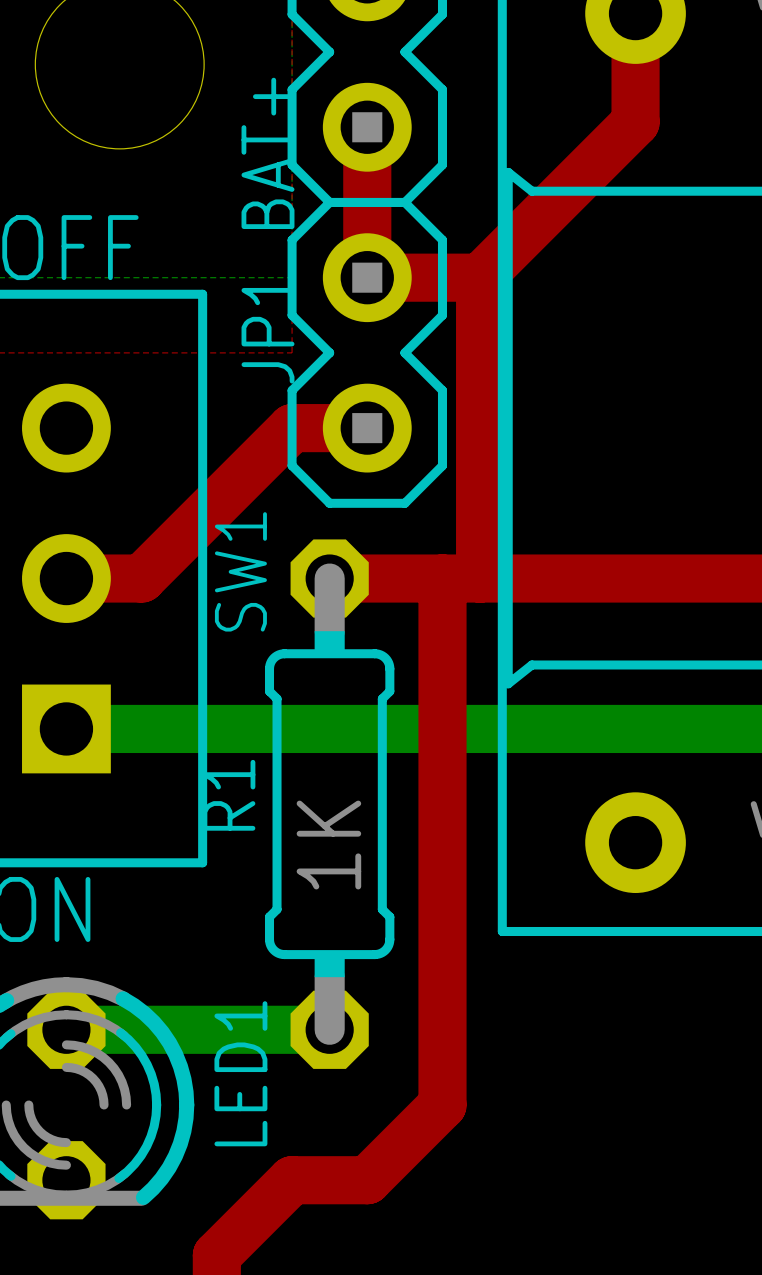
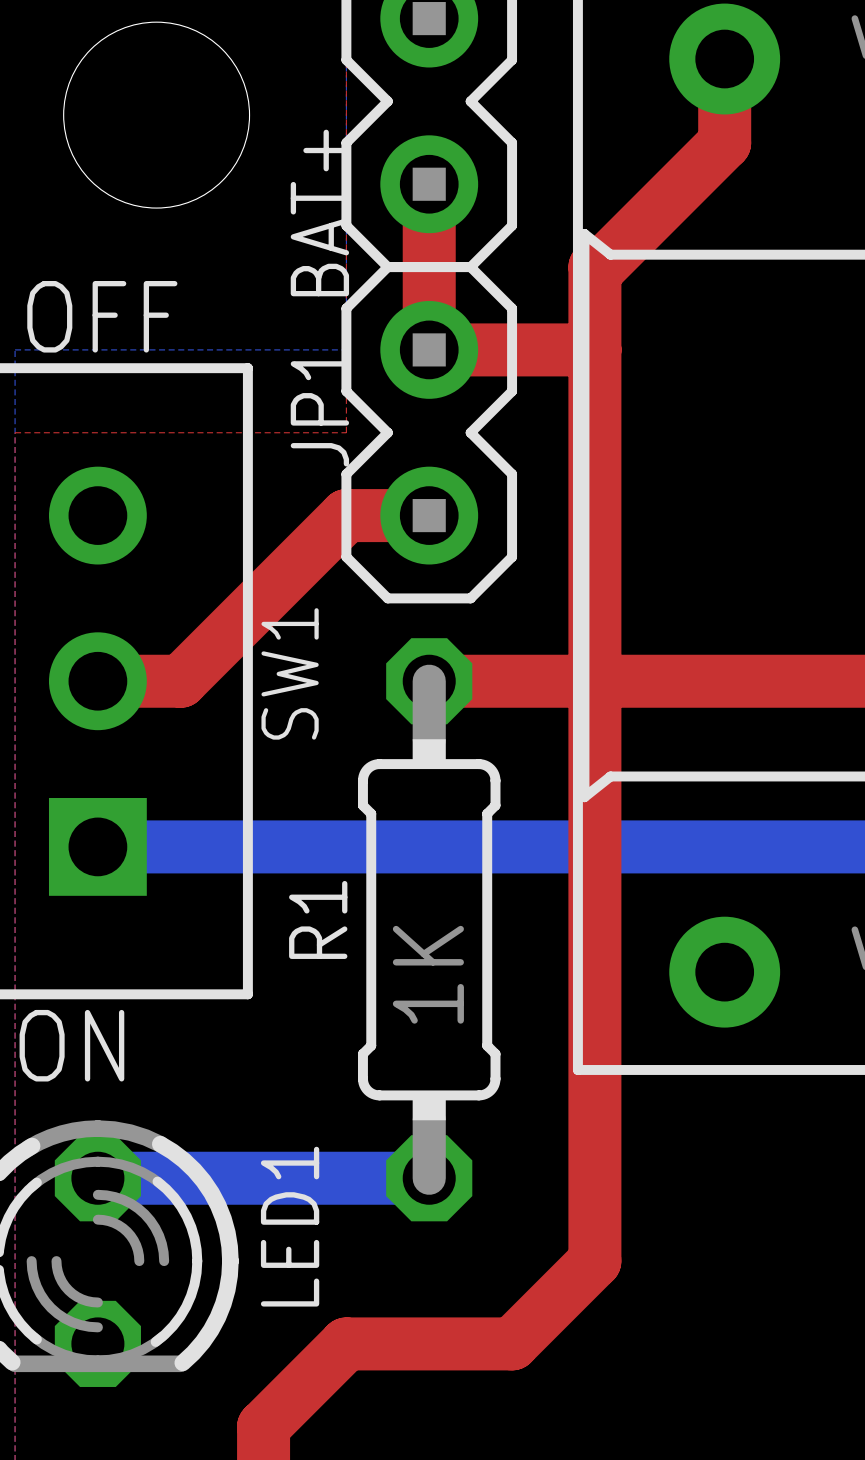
top track: (635, 89) (635, 122) (480, 277) (480, 578) -> none
top track: (442, 578) (442, 1105) (367, 1180) -> (724, 142) (600, 267) (594, 267) (594, 1261) (512, 1343) (429, 1343)
R1 position: (329, 804) -> (429, 929)

